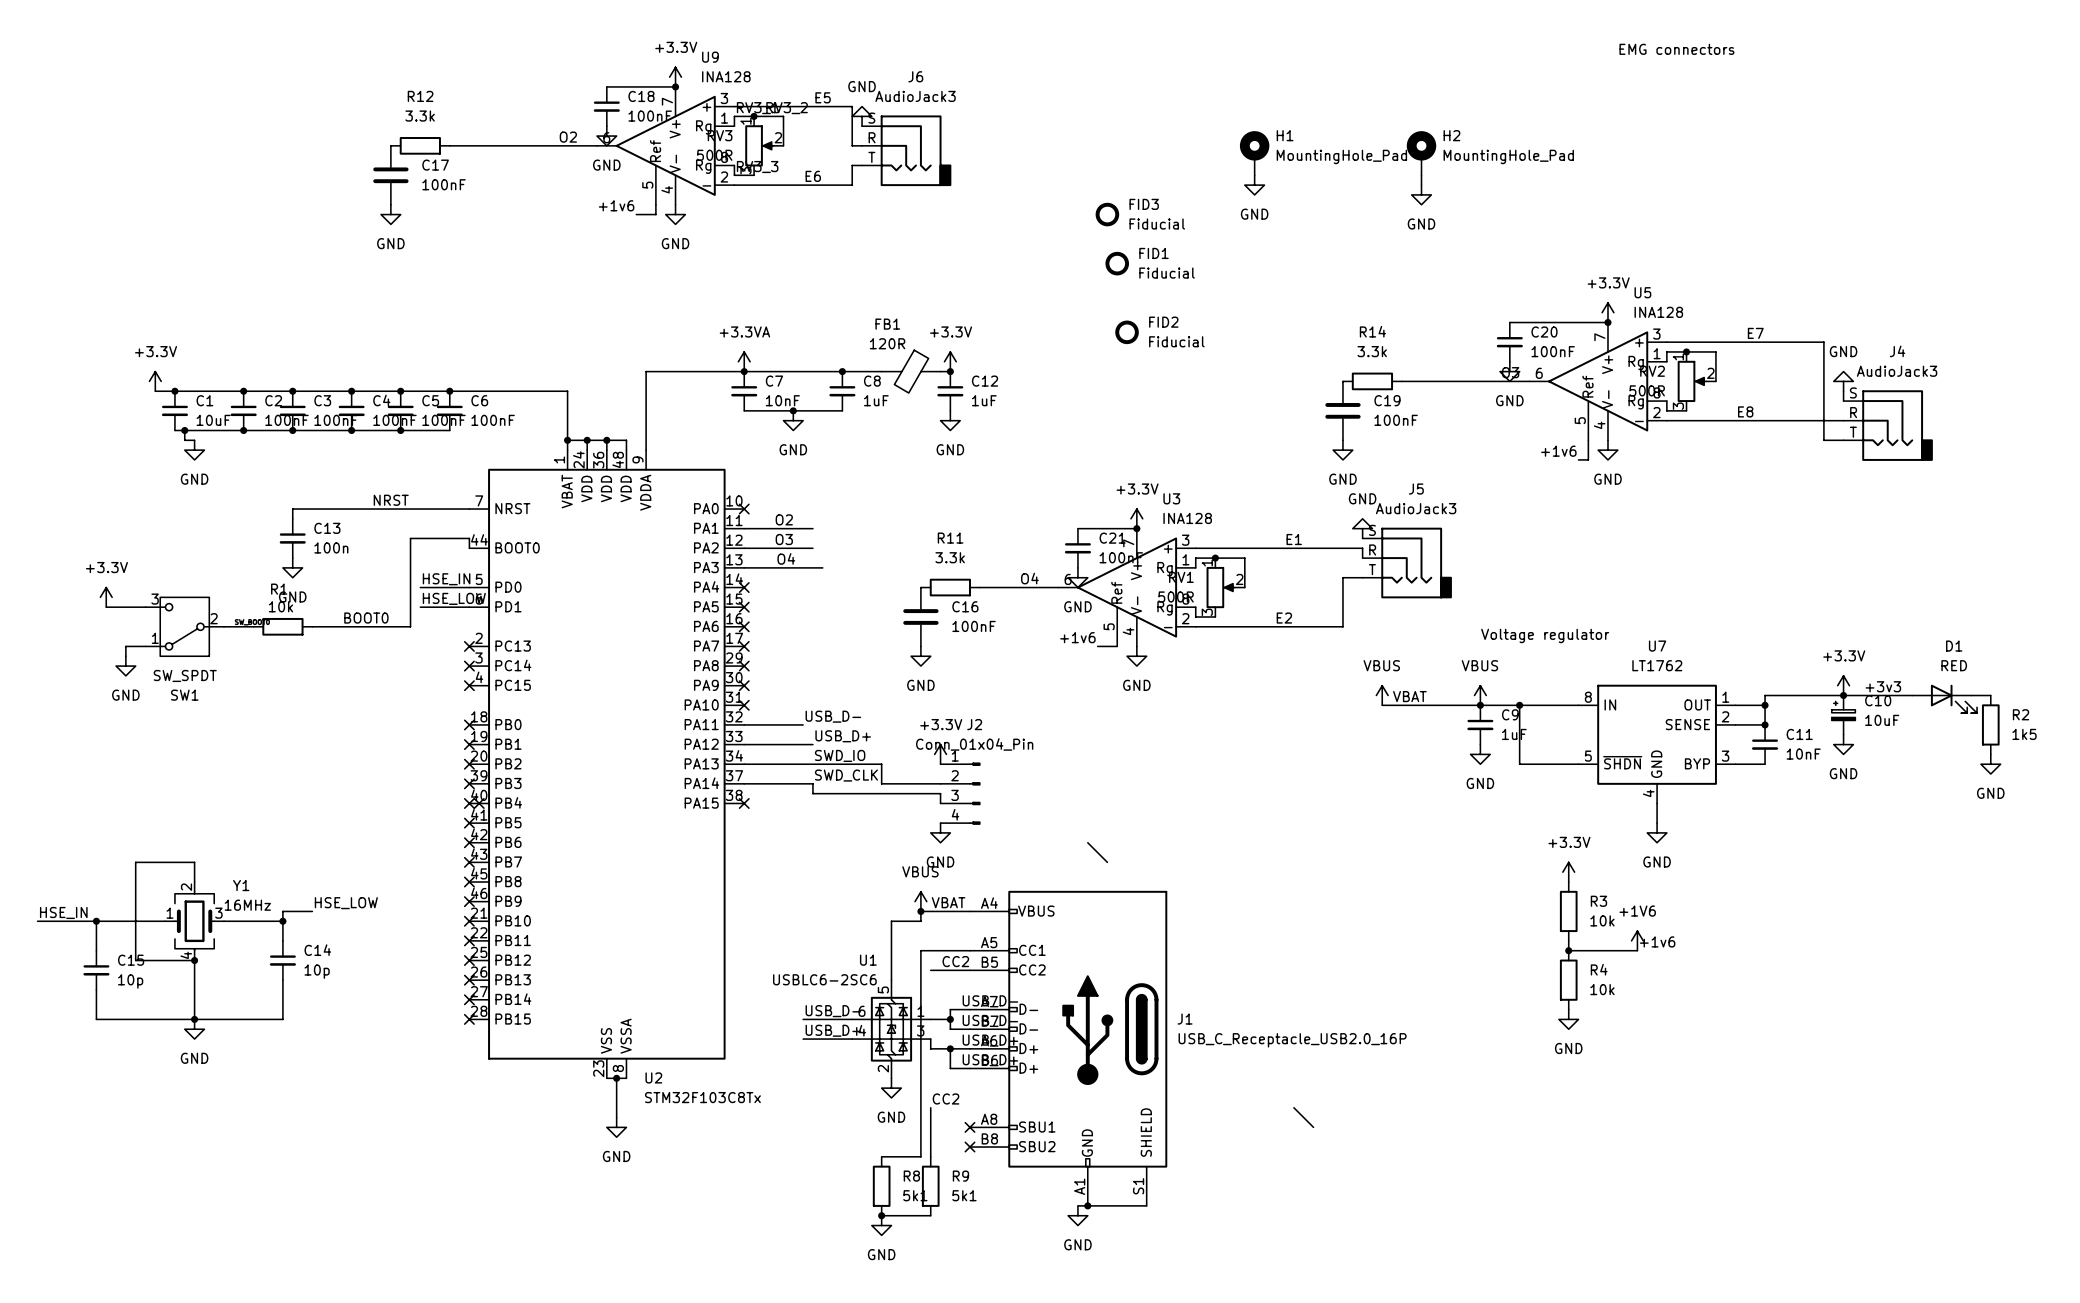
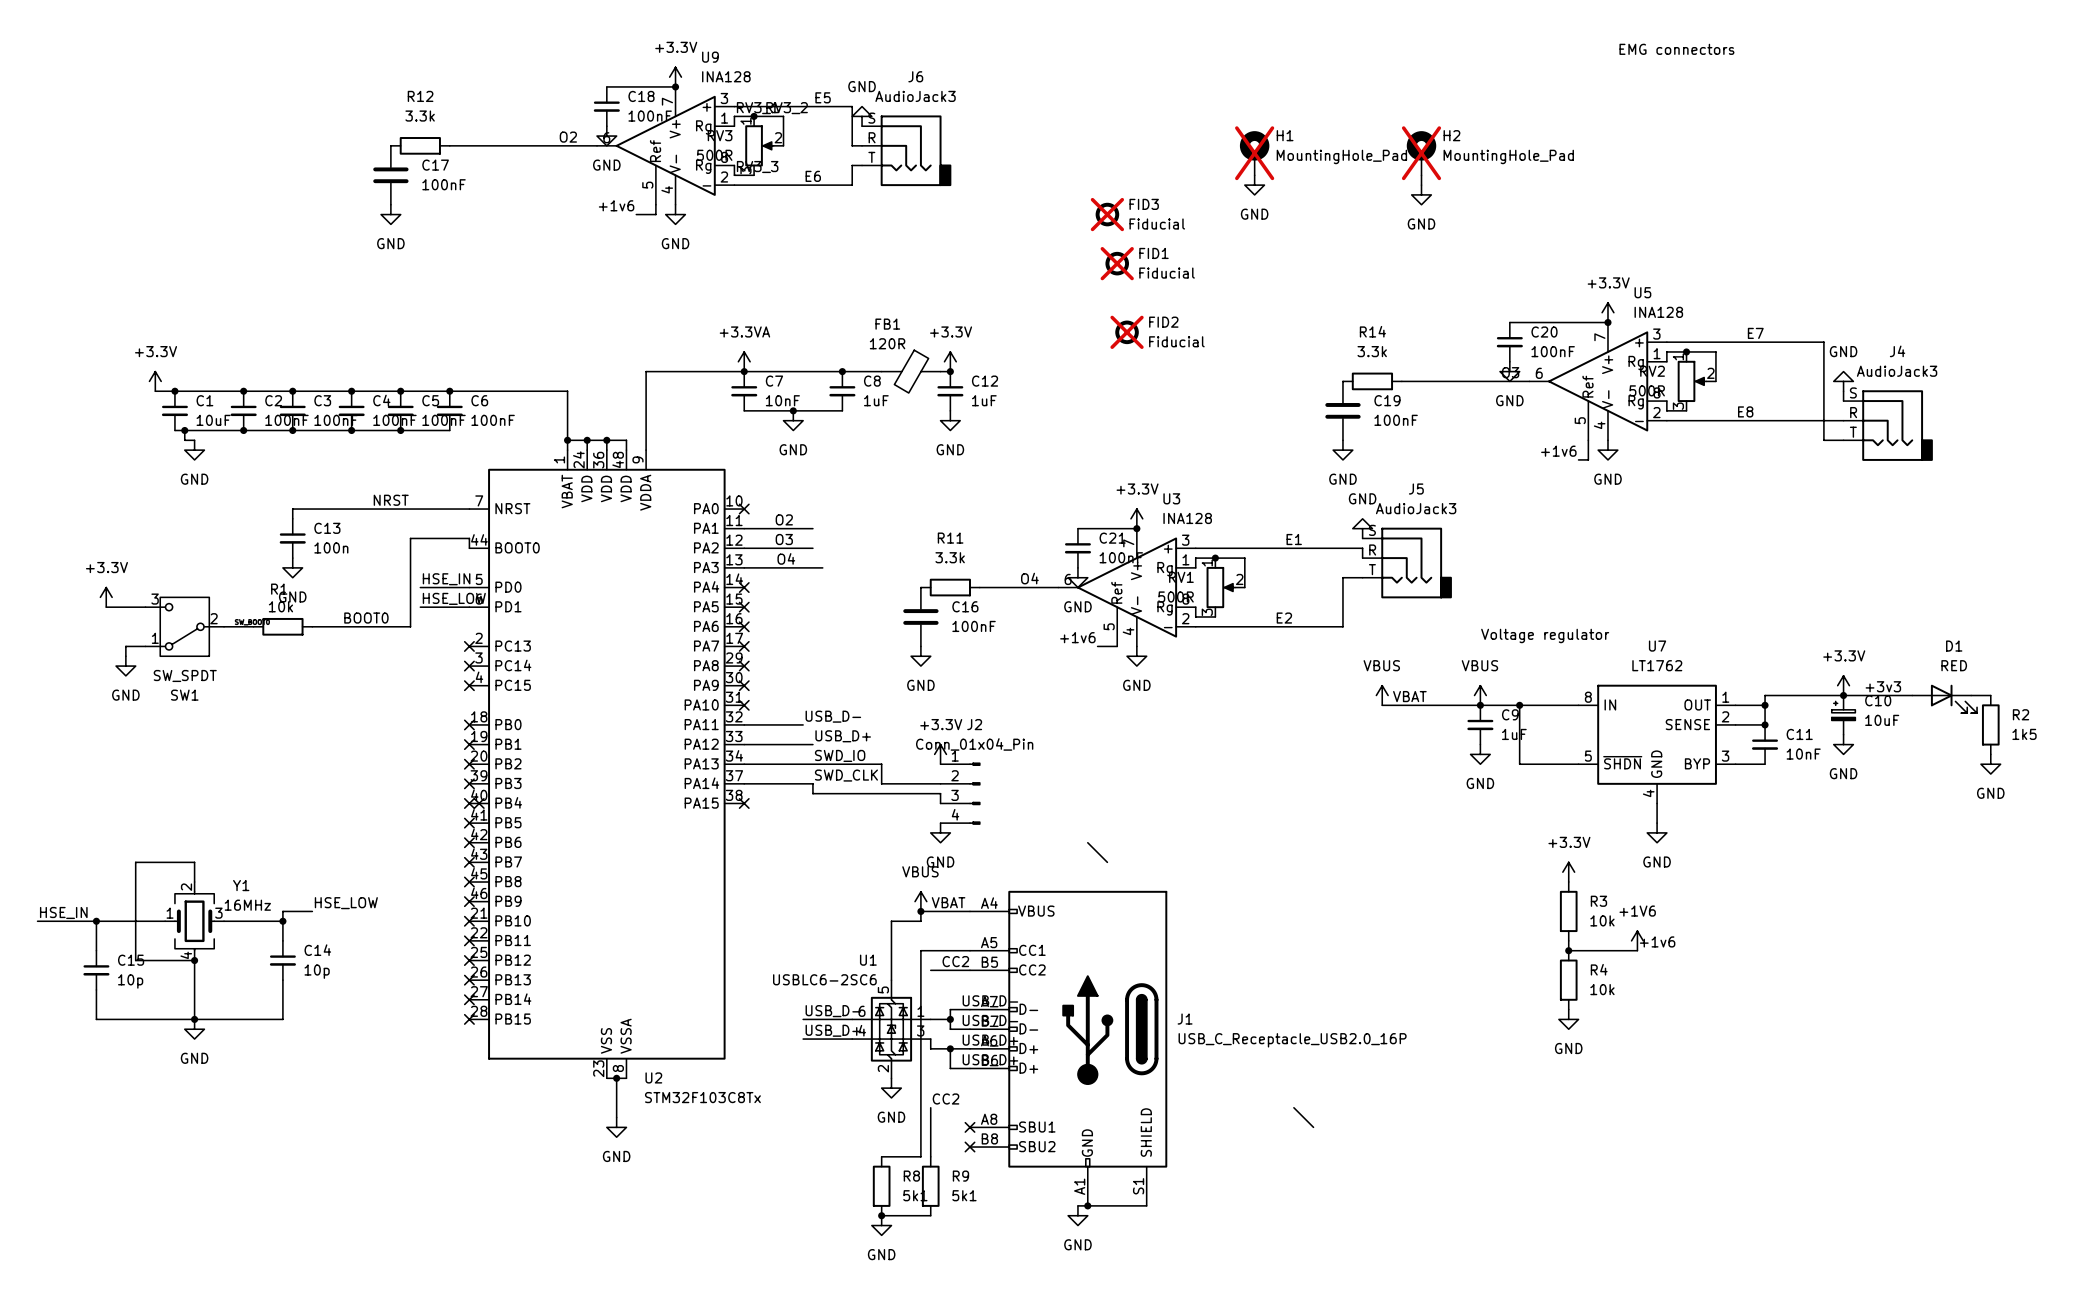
H1 do-not-place cross: none -> (1254, 153)
H2 do-not-place cross: none -> (1421, 153)
FID3 do-not-place cross: none -> (1107, 214)
FID1 do-not-place cross: none -> (1117, 263)
FID2 do-not-place cross: none -> (1127, 332)

